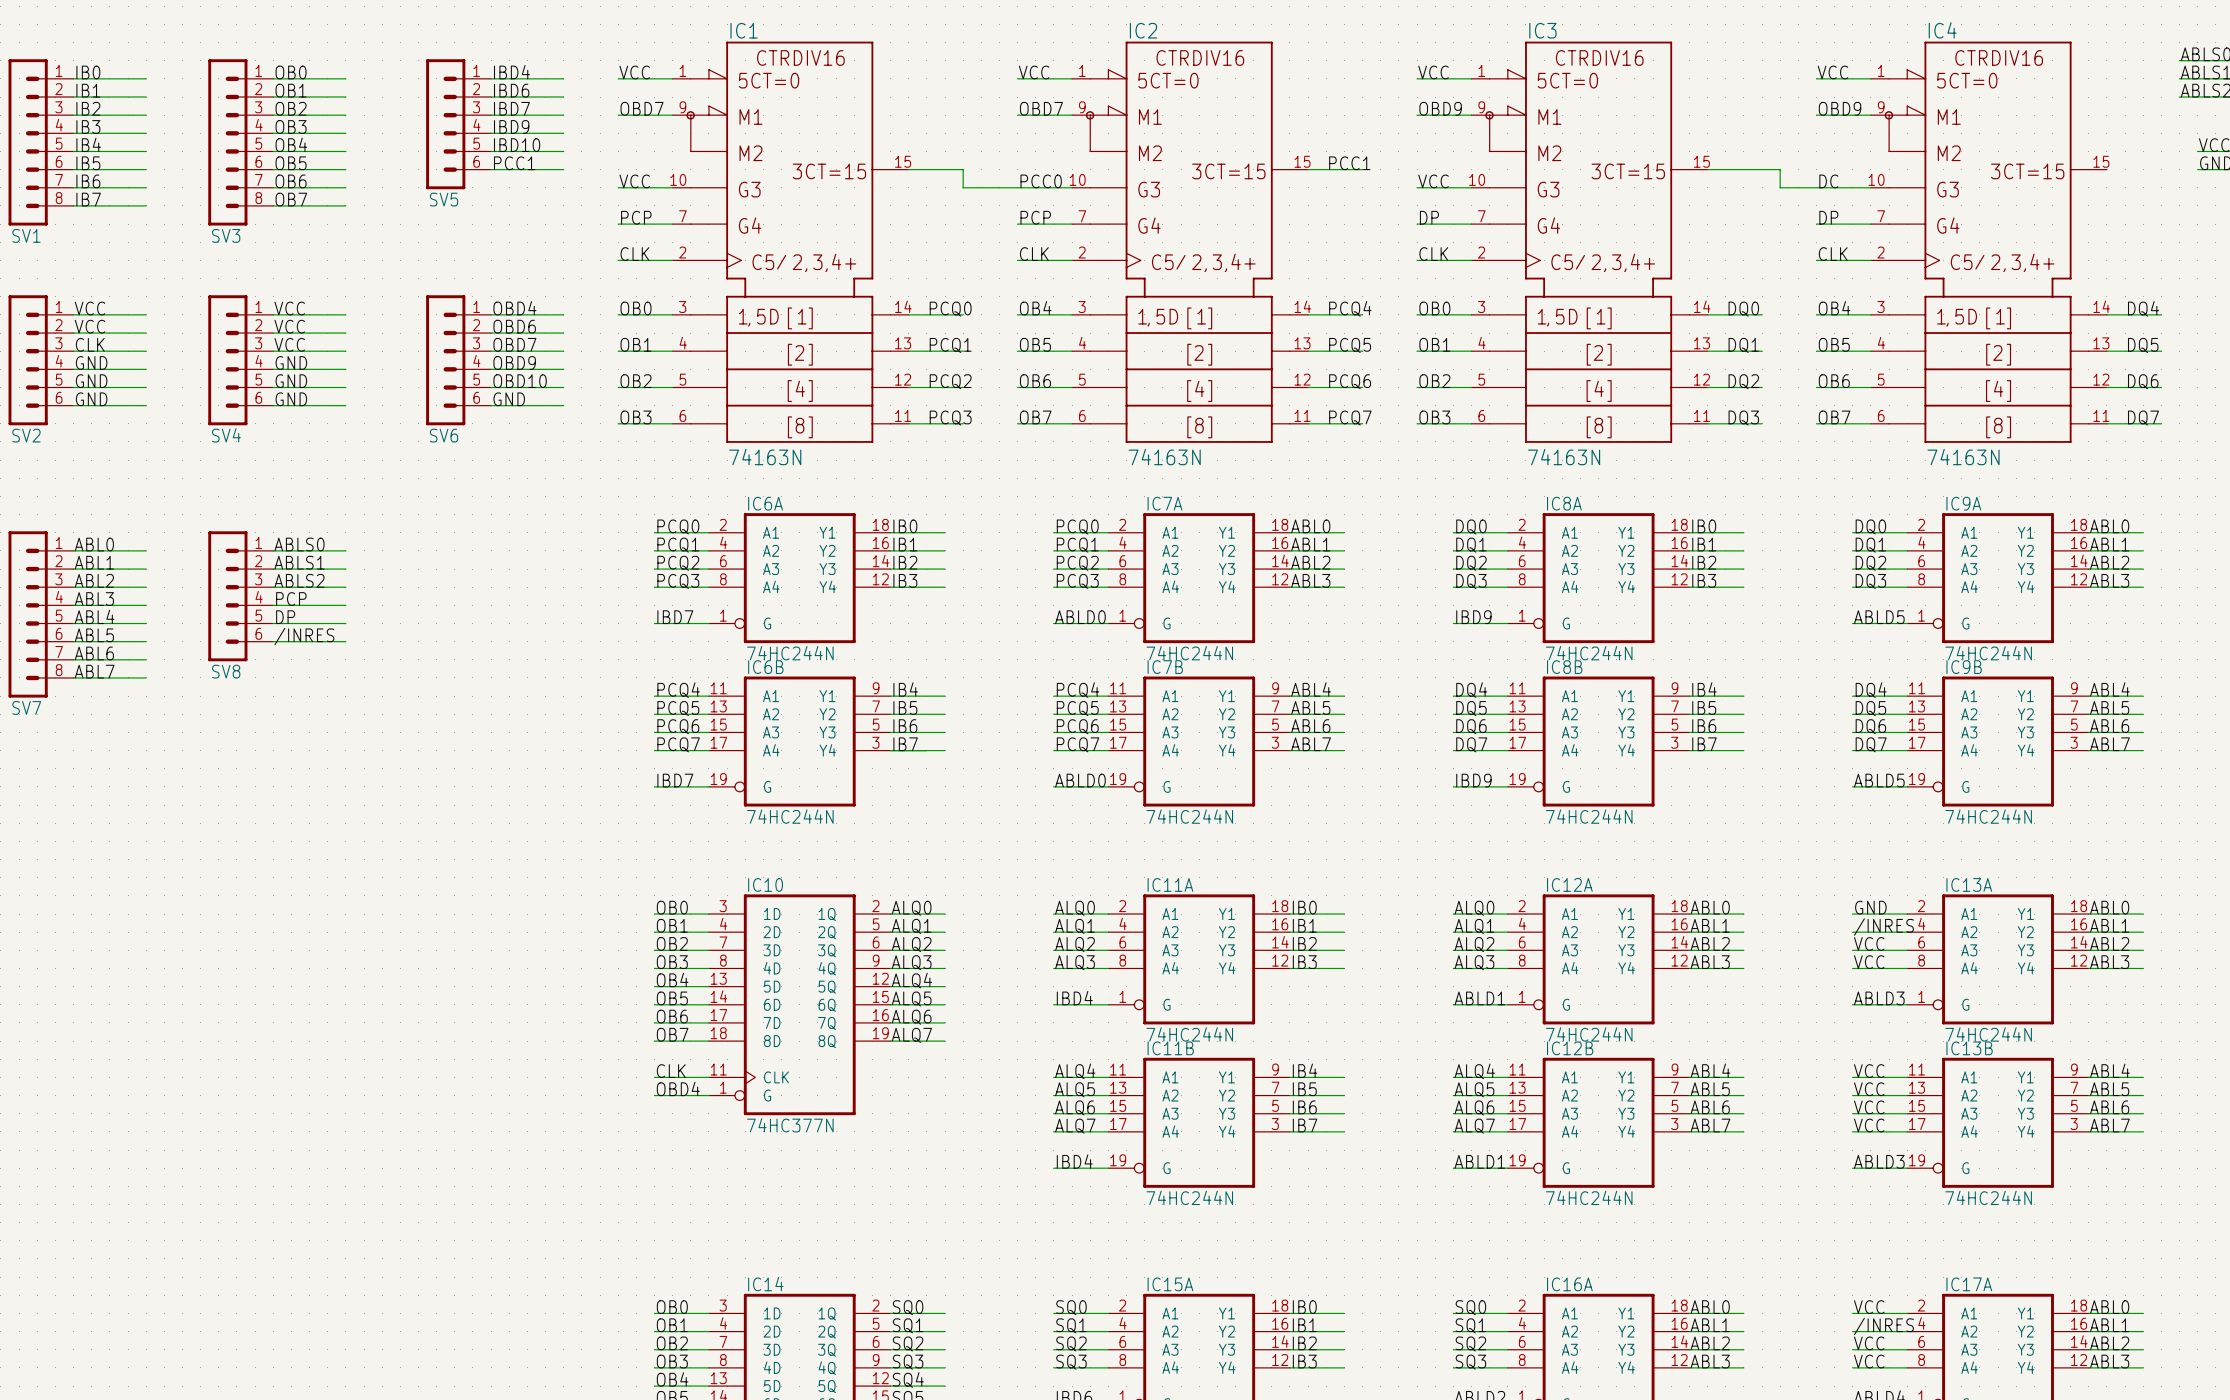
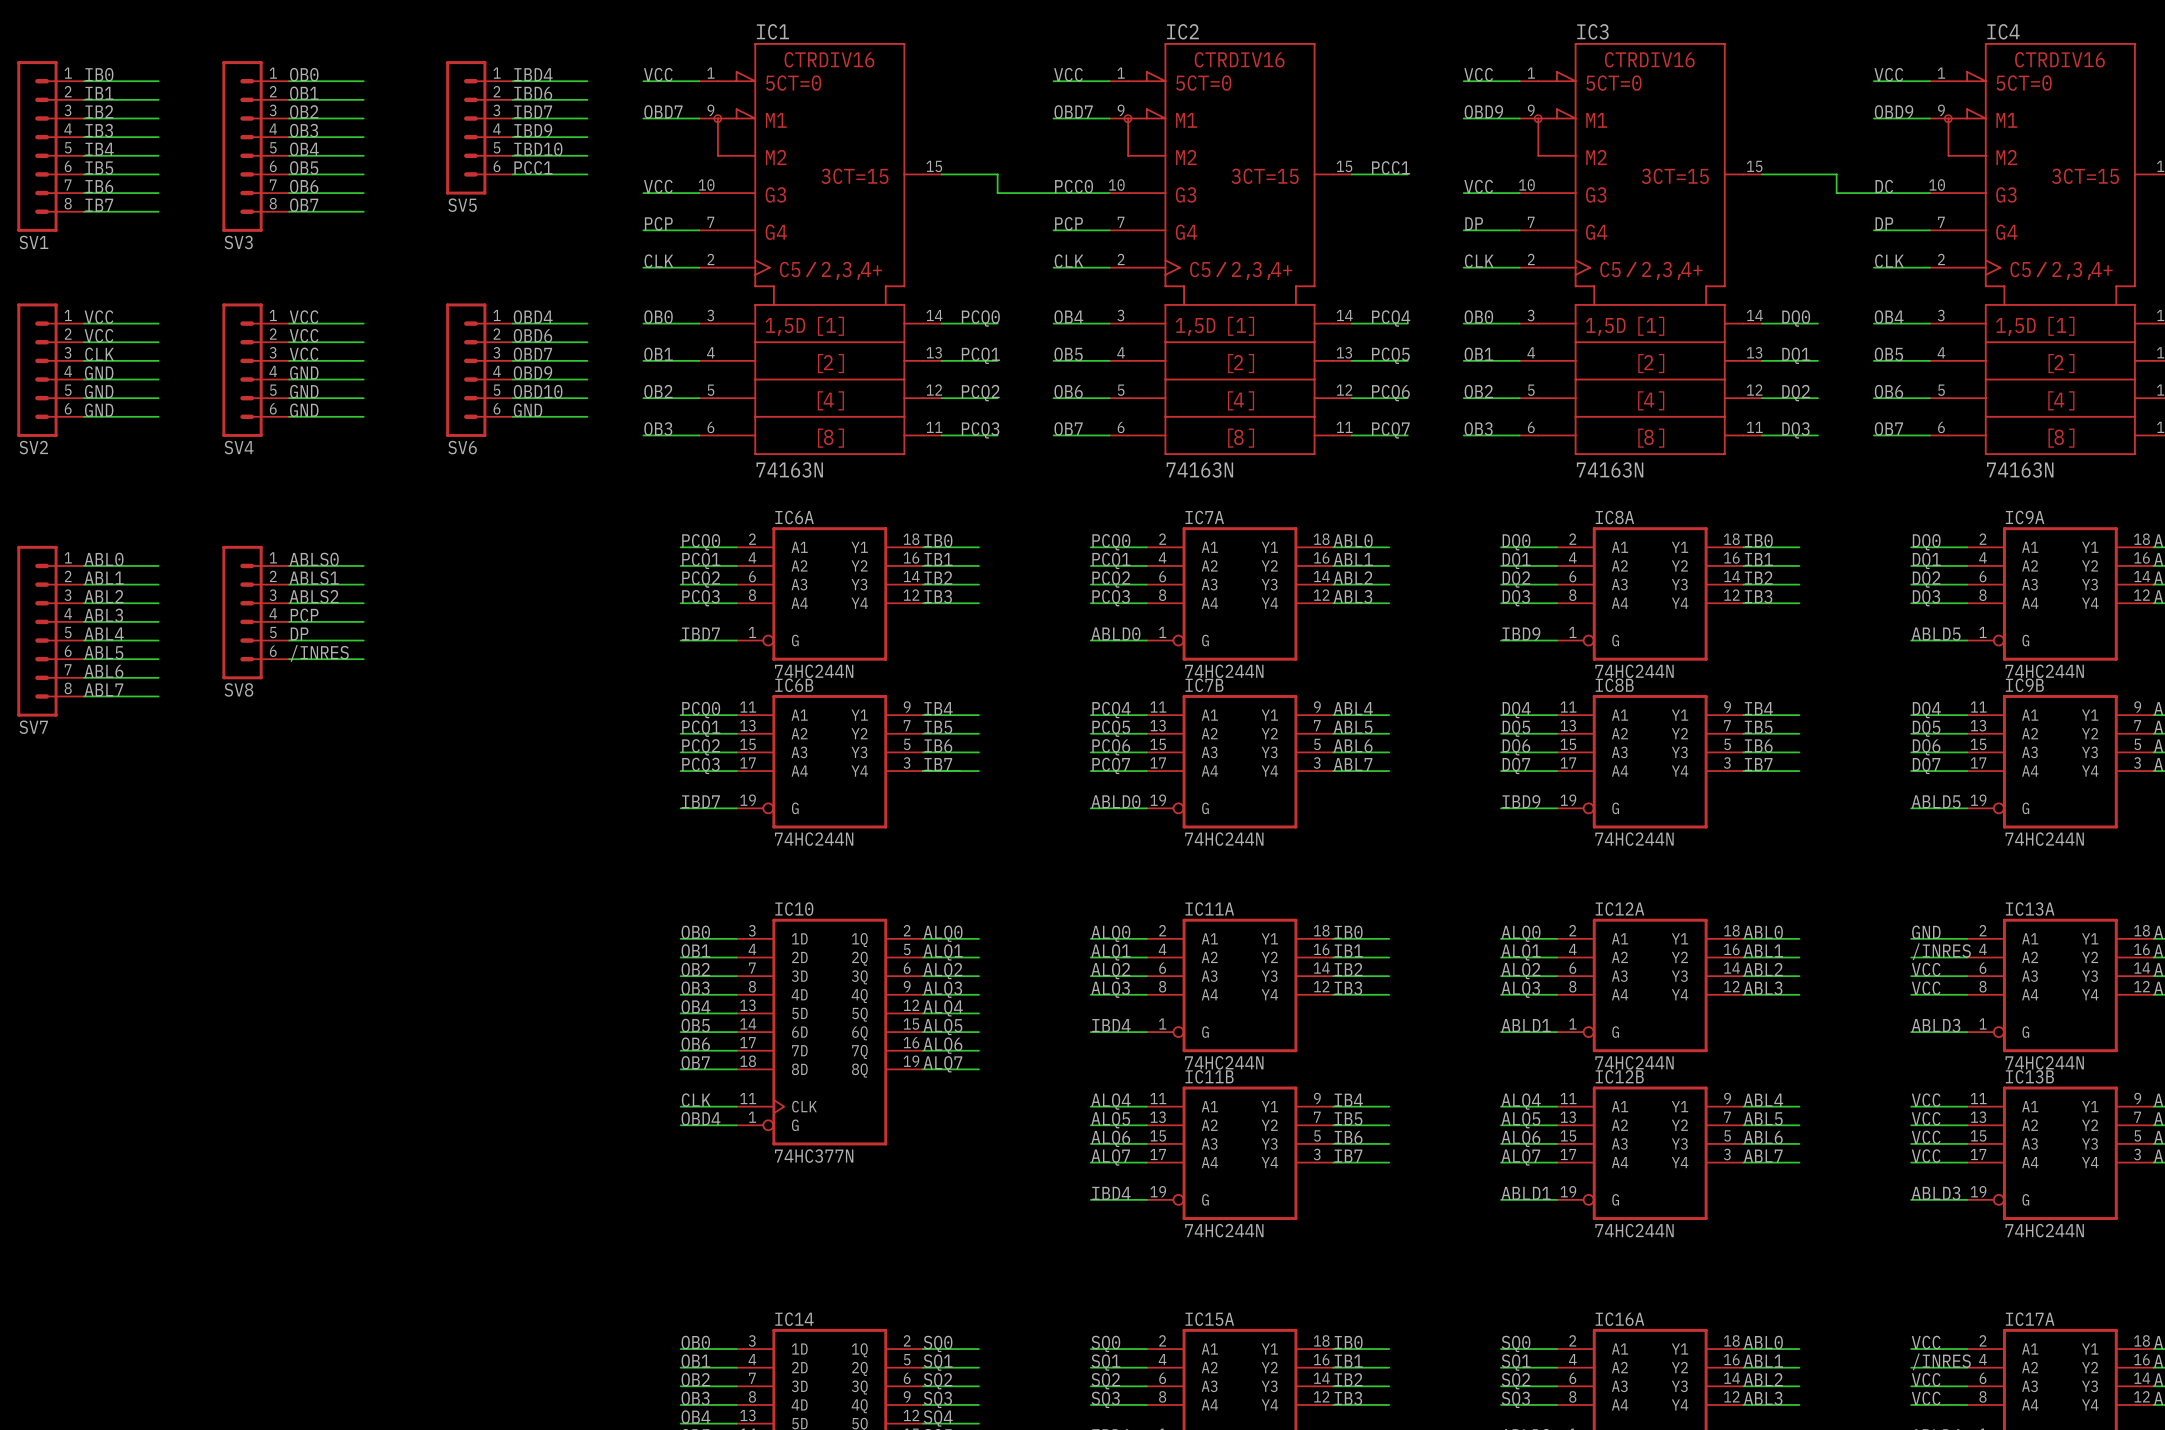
label: PCQ4 (678, 690) -> PCQ0 (701, 710)
label: PCQ5 (678, 708) -> PCQ1 (701, 728)
label: PCQ6 (678, 726) -> PCQ2 (701, 747)
label: PCQ7 (678, 744) -> PCQ3 (700, 765)

